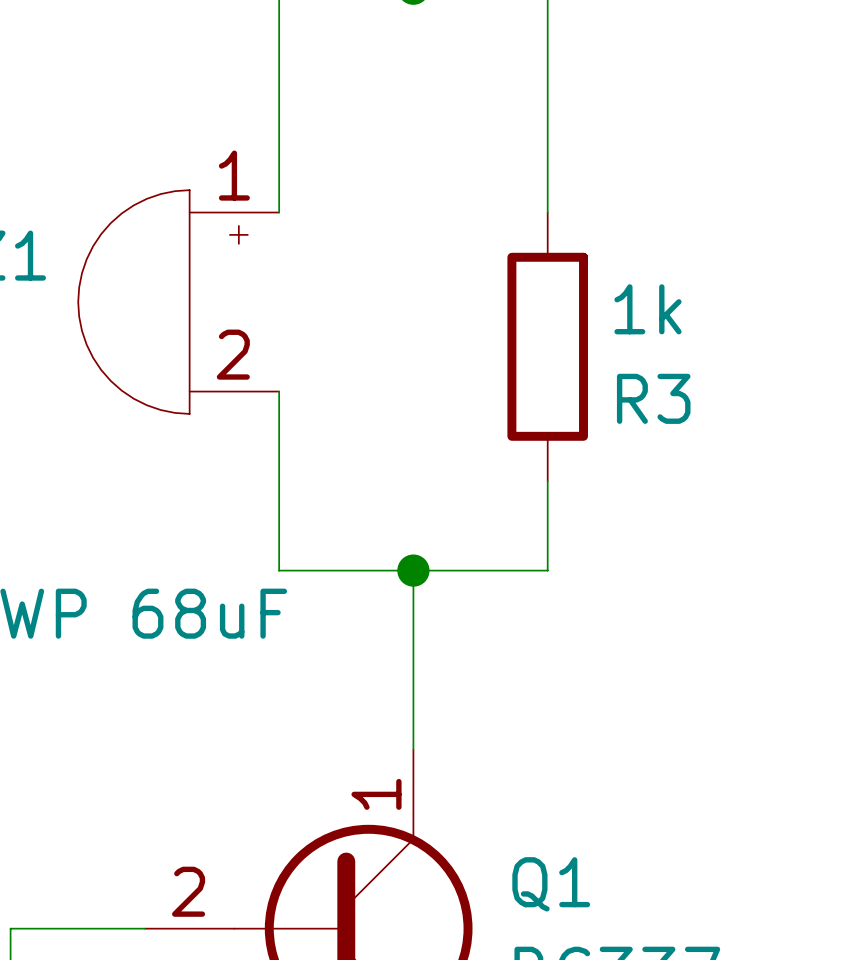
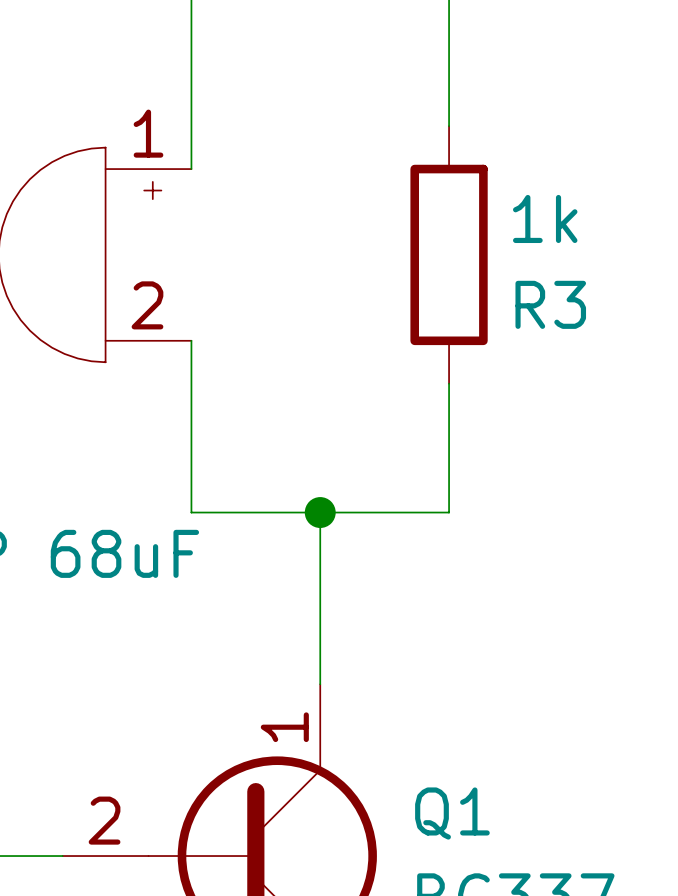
R3 position: (547, 346) -> (449, 254)

